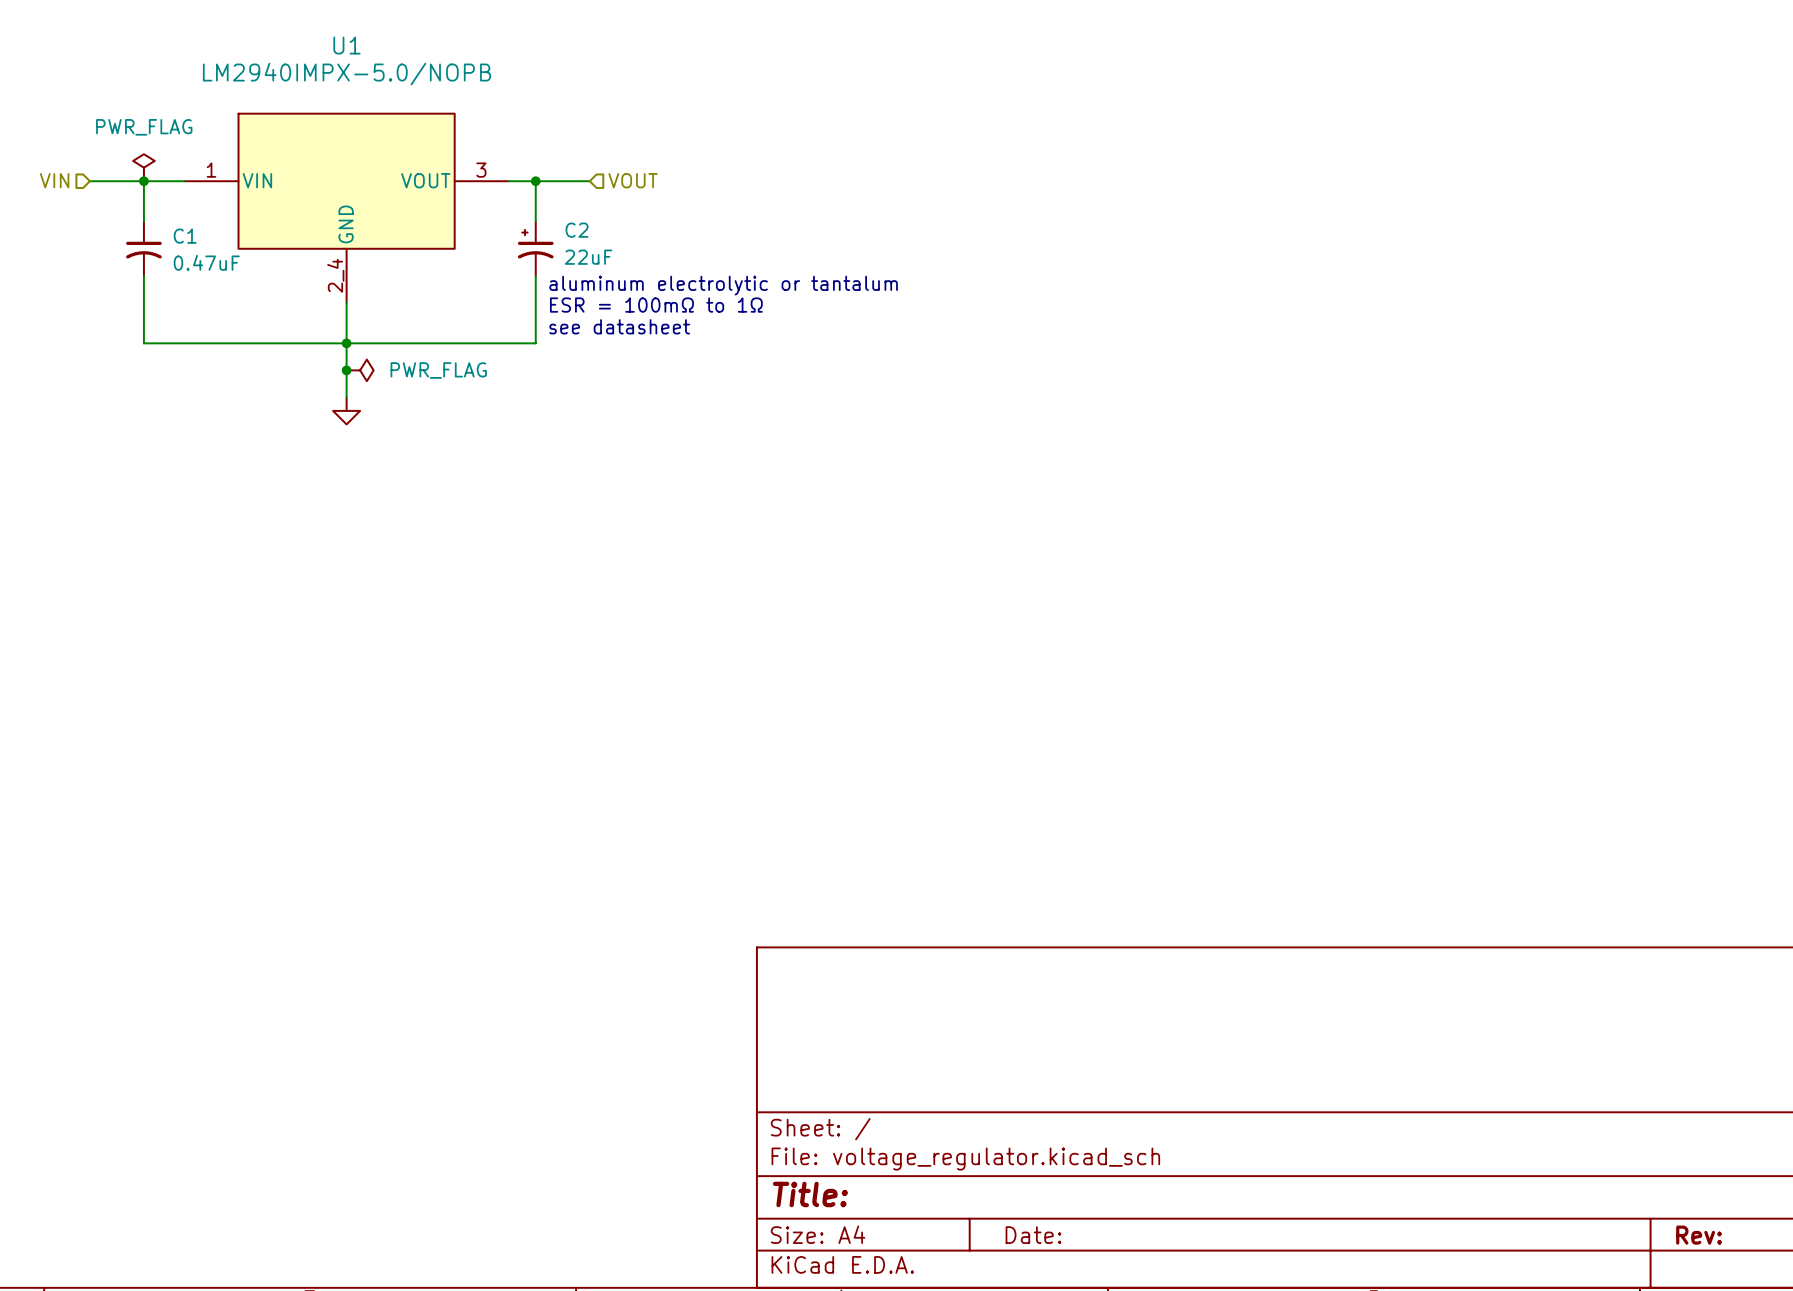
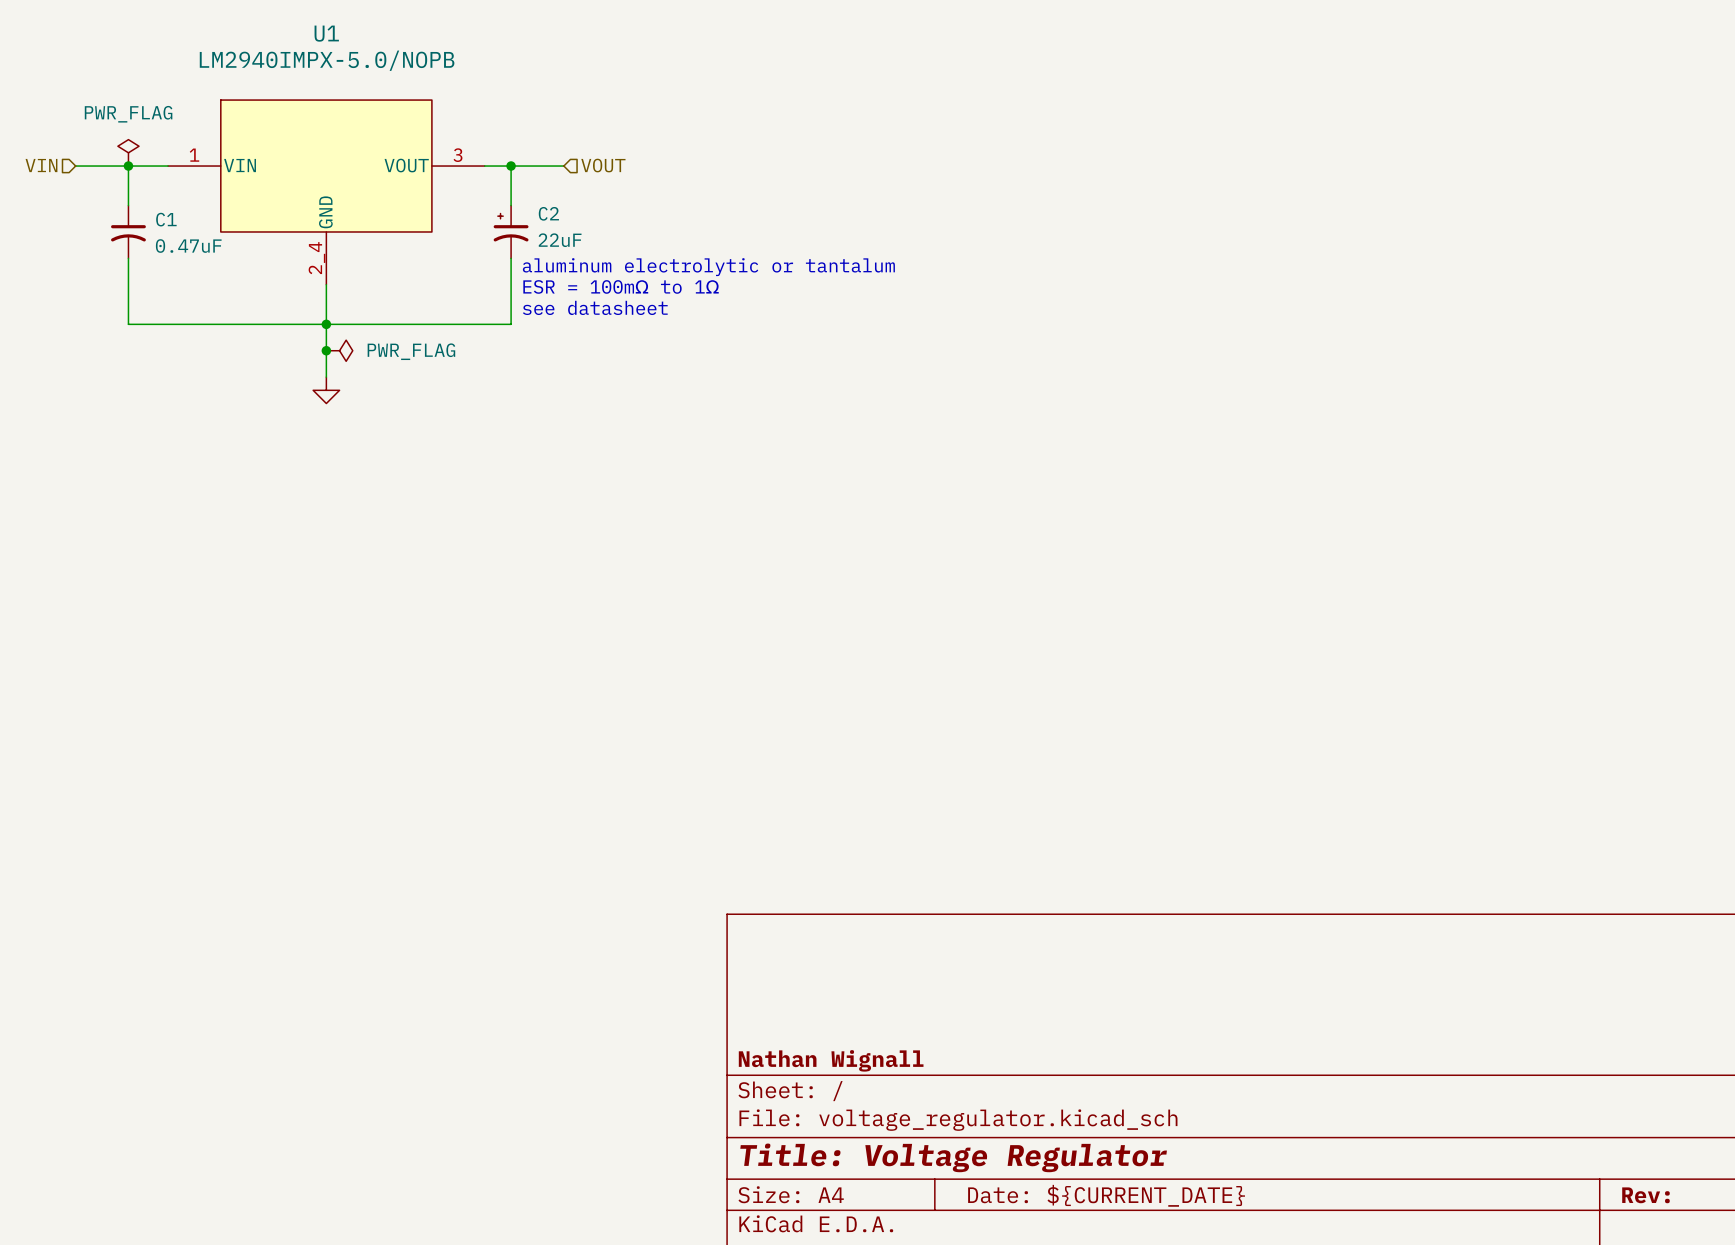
title block: none -> Nathan Wignall (831, 1060)
title block: Title: (810, 1194) -> Title: Voltage Regulator (953, 1157)
title block: Date: (1033, 1235) -> Date: ${CURRENT_DATE} (1106, 1195)

